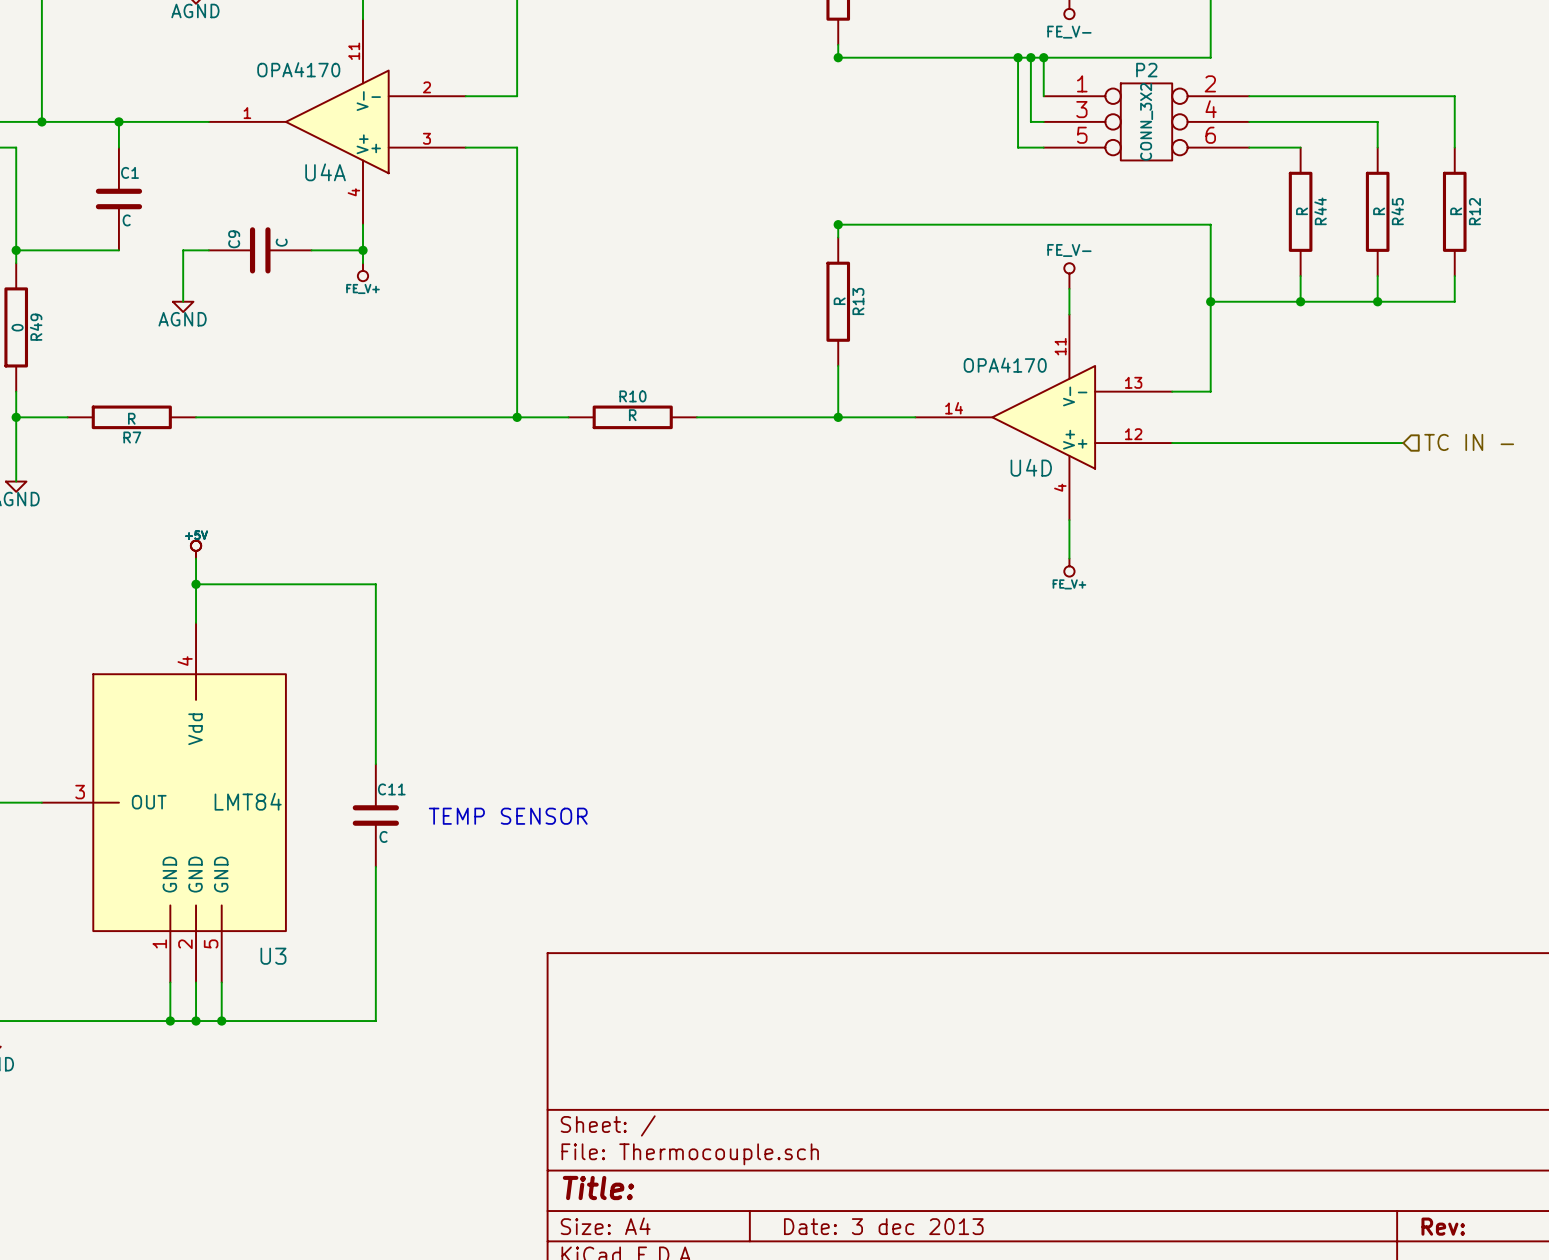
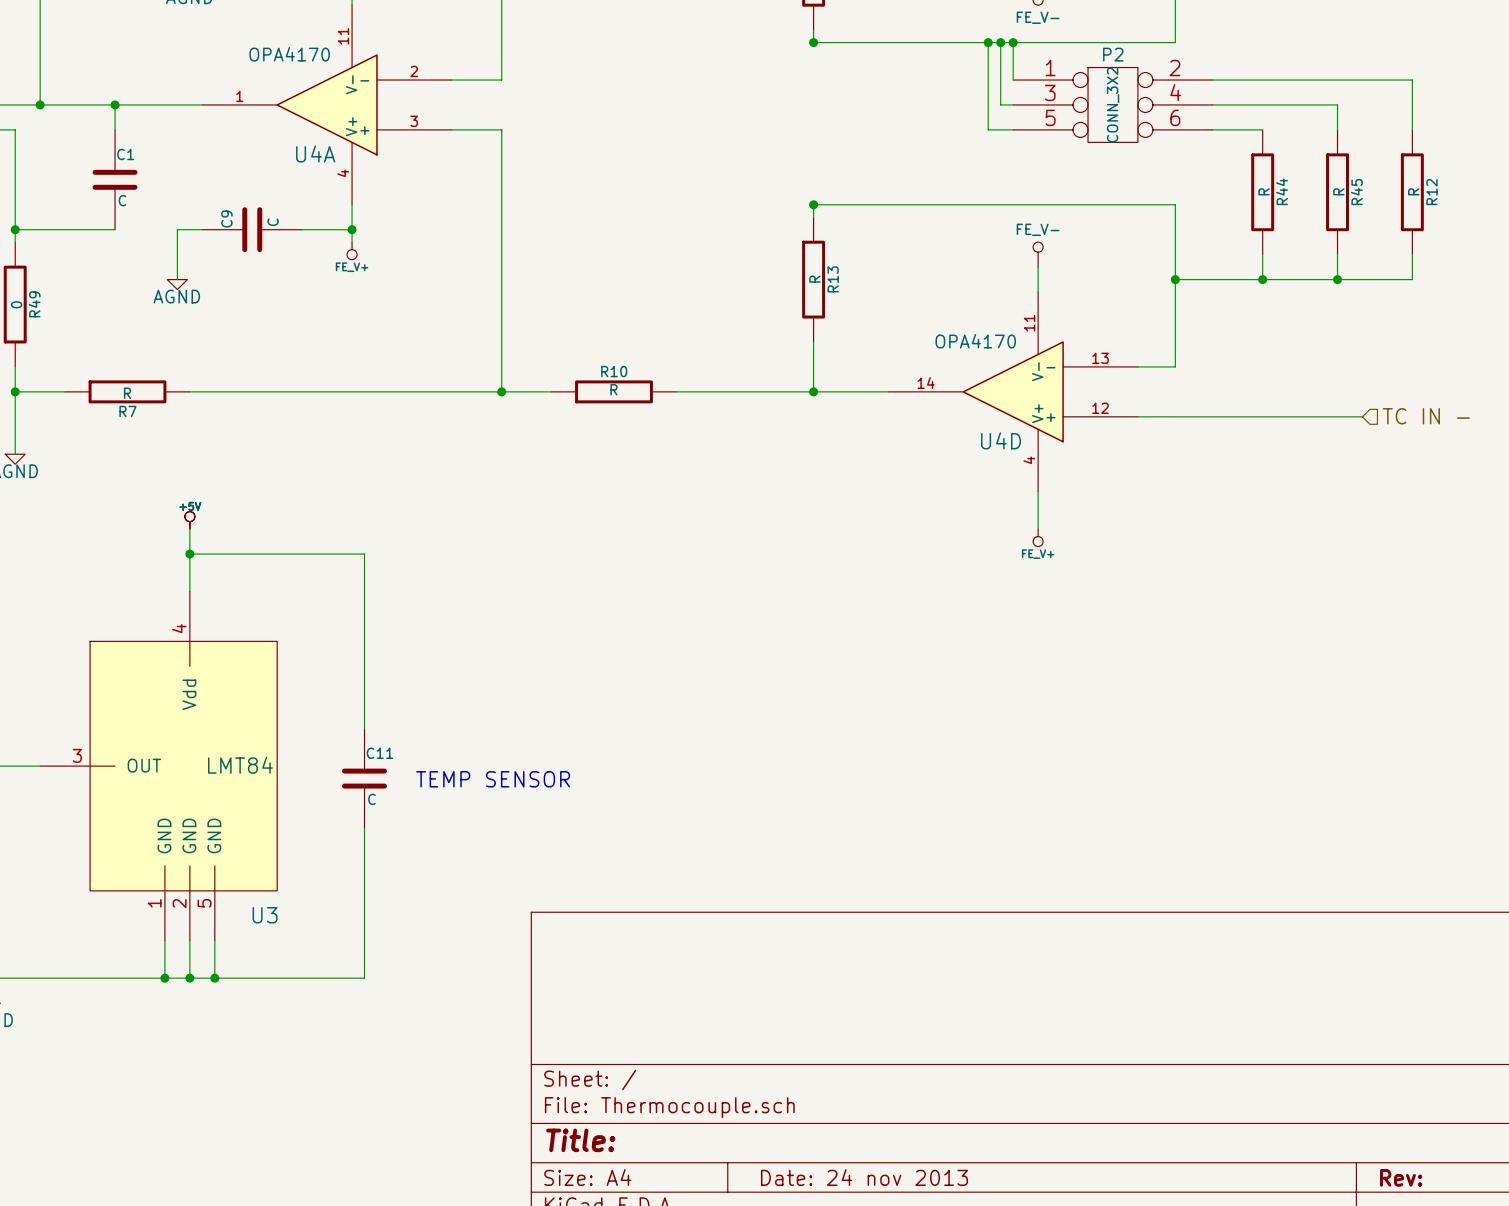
title block: Date: 3 dec 2013 (883, 1226) -> Date: 24 nov 2013 (864, 1177)

